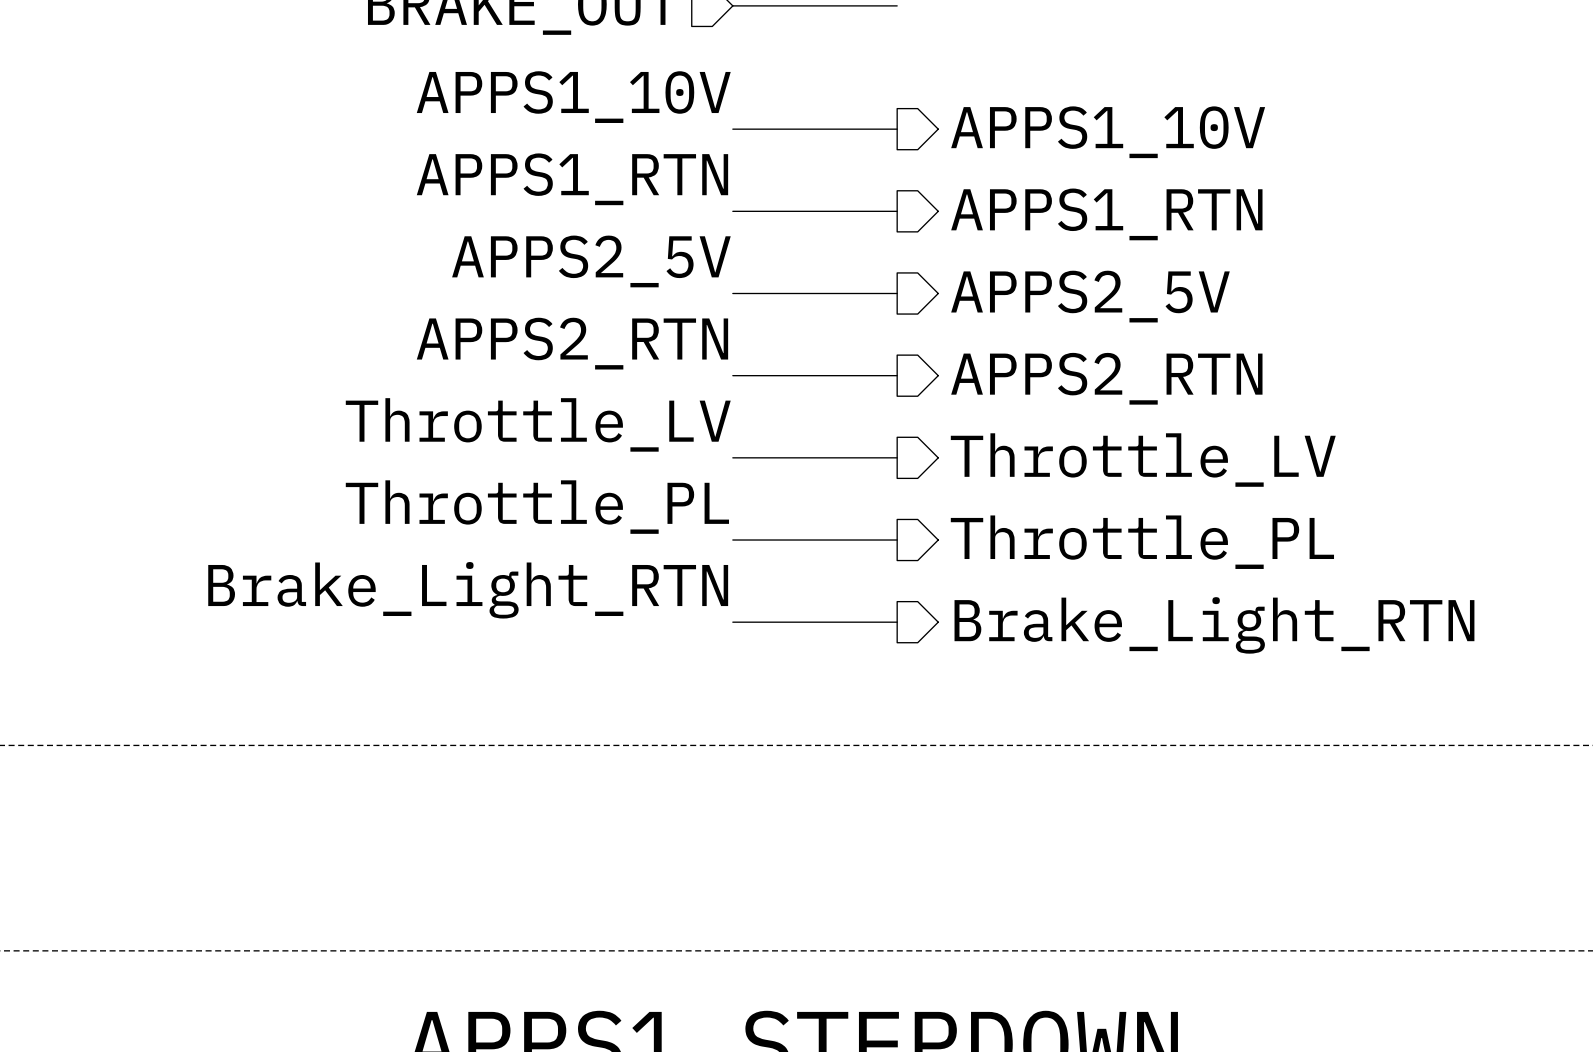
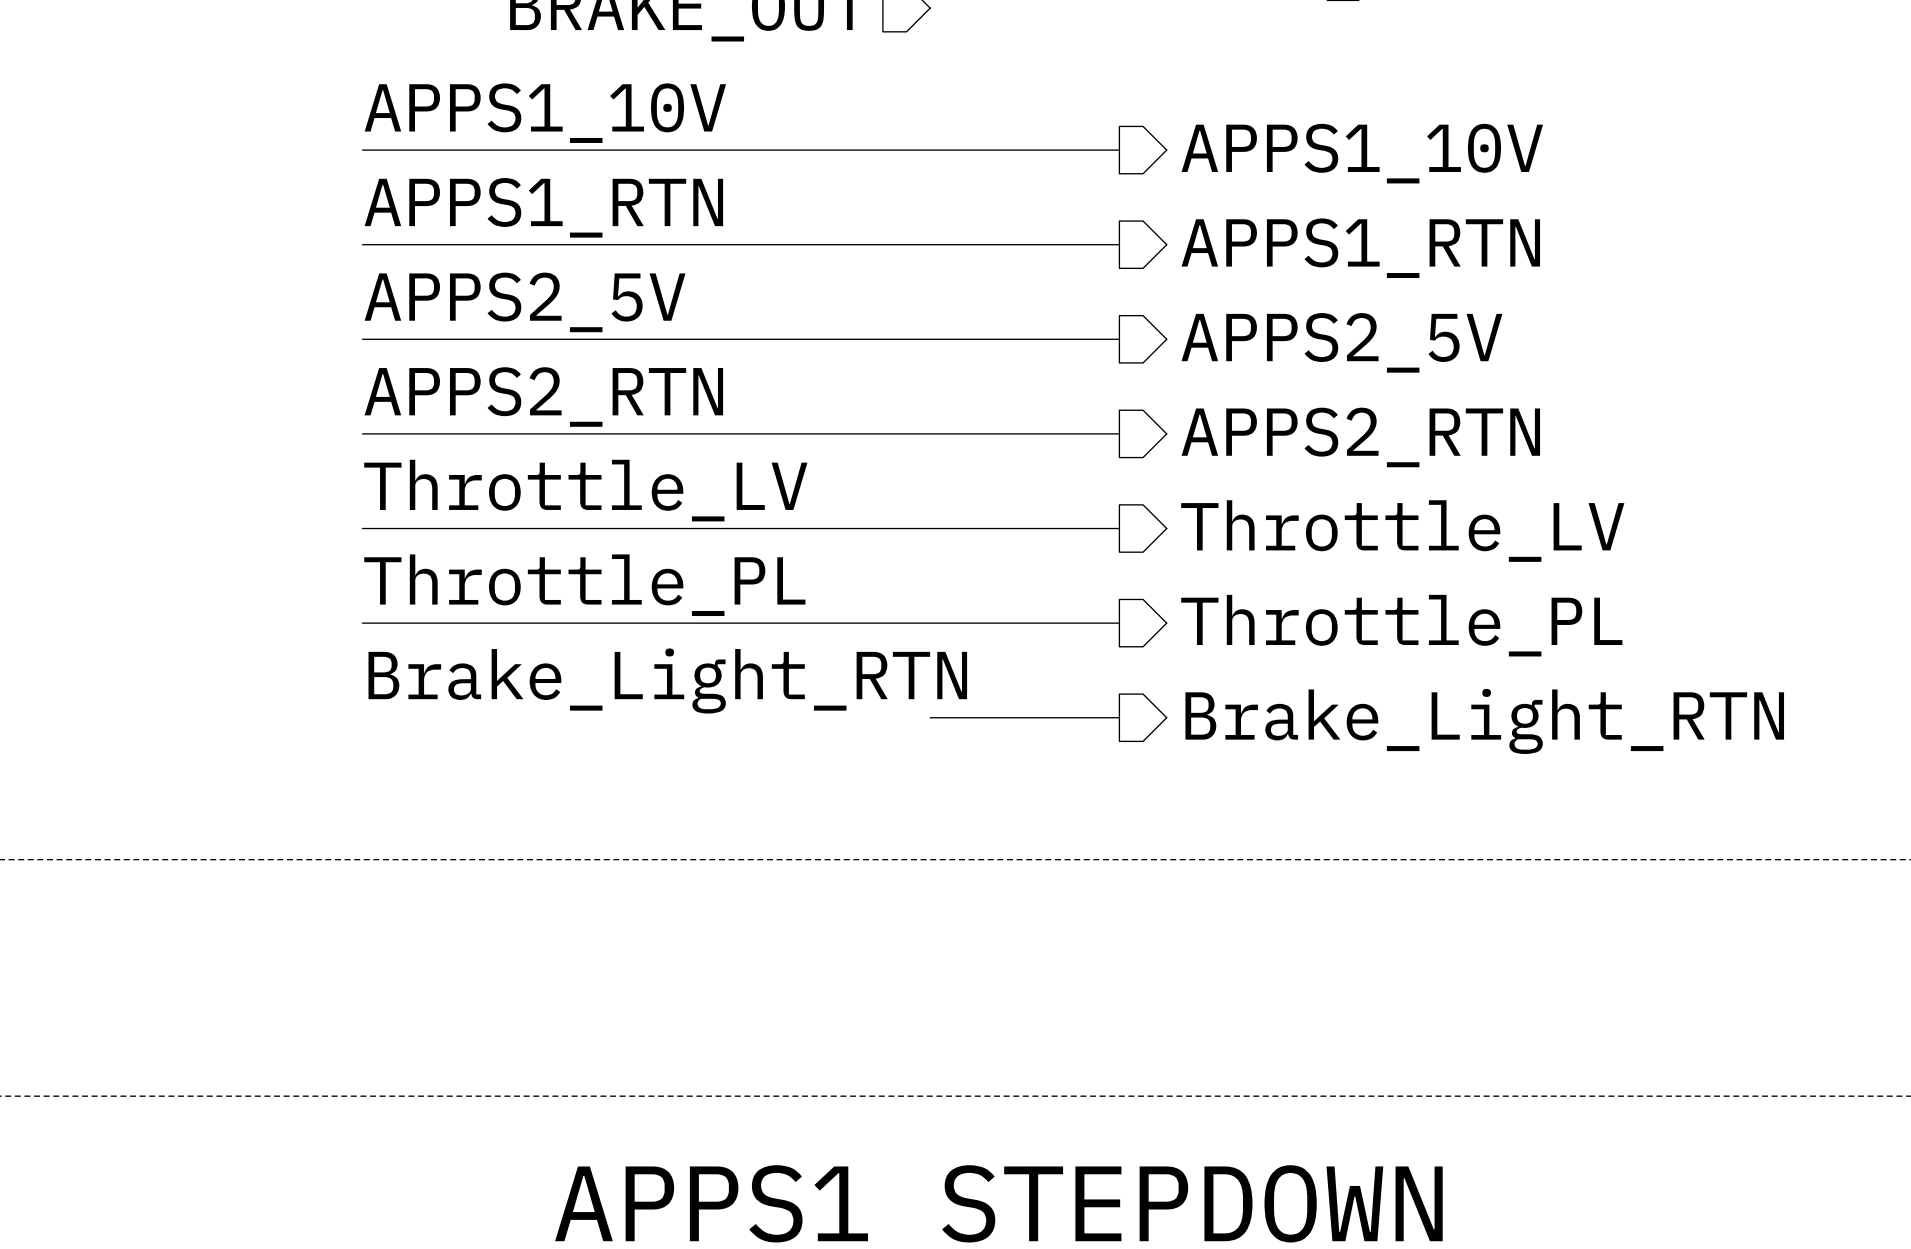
wire: (732, 5) (897, 5) -> none
label position: APPS1_10V (573, 97) -> APPS1_10V (545, 113)
wire: none -> (362, 150) (930, 150)
label position: APPS1_RTN (572, 179) -> APPS1_RTN (543, 207)
wire: none -> (362, 244) (930, 244)
label position: APPS2_5V (591, 261) -> APPS2_5V (525, 302)
wire: none -> (362, 339) (930, 339)
label position: APPS2_RTN (572, 343) -> APPS2_RTN (543, 397)
wire: none -> (362, 433) (930, 433)
label position: Throttle_LV (538, 424) -> Throttle_LV (585, 490)
wire: none -> (362, 528) (930, 528)
label position: Throttle_PL (537, 507) -> Throttle_PL (584, 585)
wire: none -> (362, 623) (930, 623)
label position: Brake_Light_RTN (468, 590) -> Brake_Light_RTN (667, 681)

